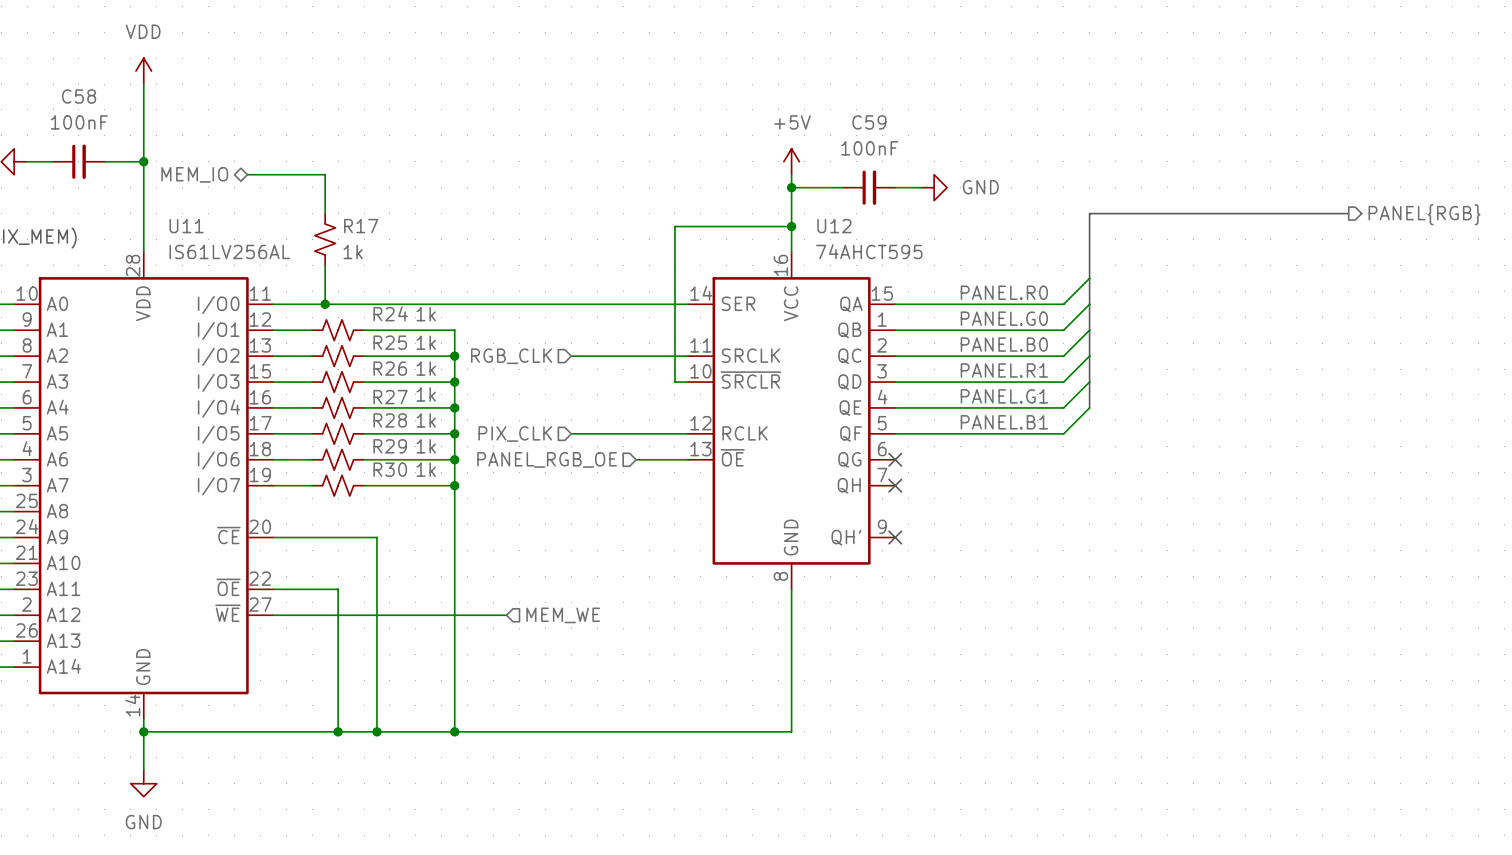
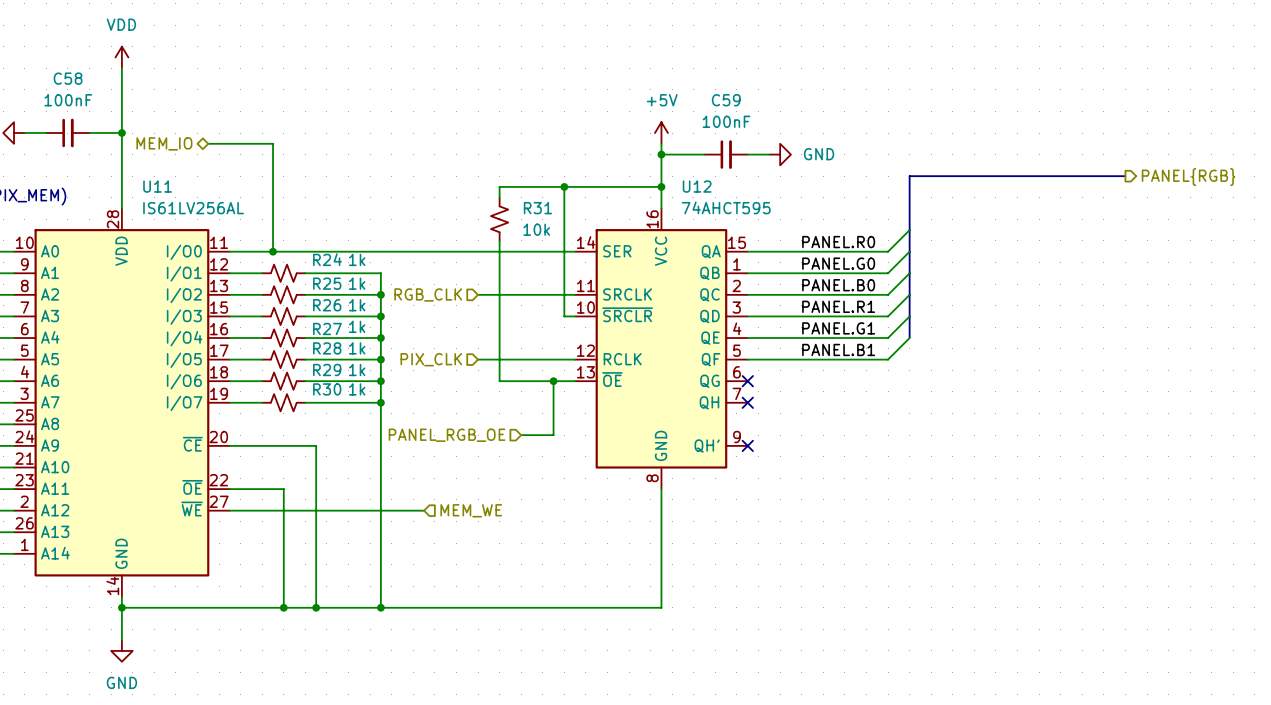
wire: none -> (564, 186) (499, 186) (499, 197)
junction: none -> (564, 186)
R17: 1k (325, 239) -> none
R31: none -> 10k (499, 219)
wire: none -> (499, 240) (499, 381) (531, 381)
hierarchical label position: PANEL_RGB_OE (547, 459) -> PANEL_RGB_OE (447, 435)
wire: none -> (553, 381) (553, 435) (521, 435)
junction: none -> (553, 381)

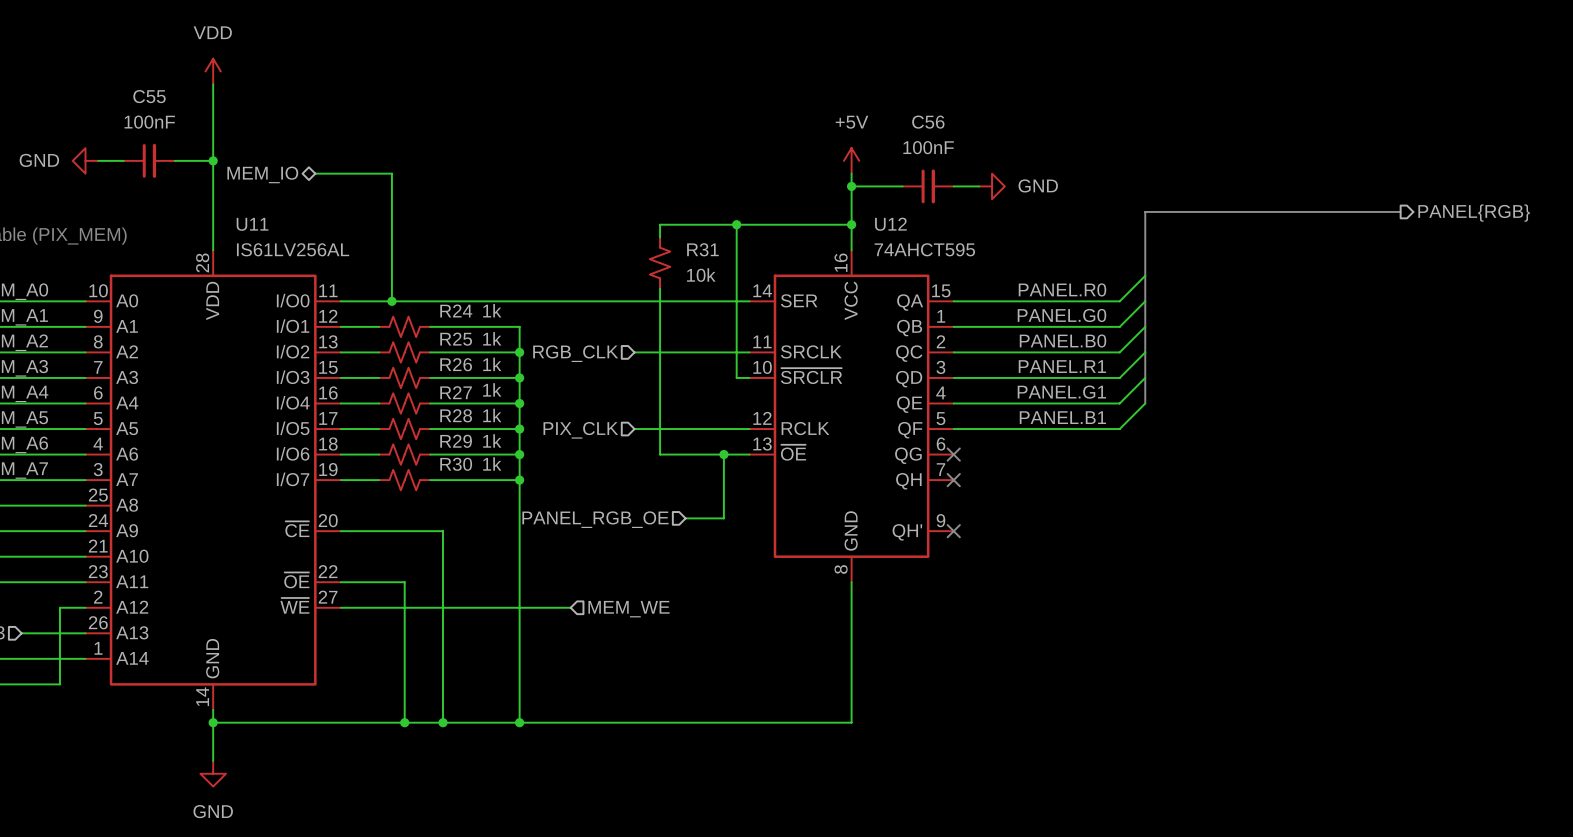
C58 name: C58 (68, 78) -> C55 (149, 96)
C59 name: C59 (726, 100) -> C56 (928, 122)

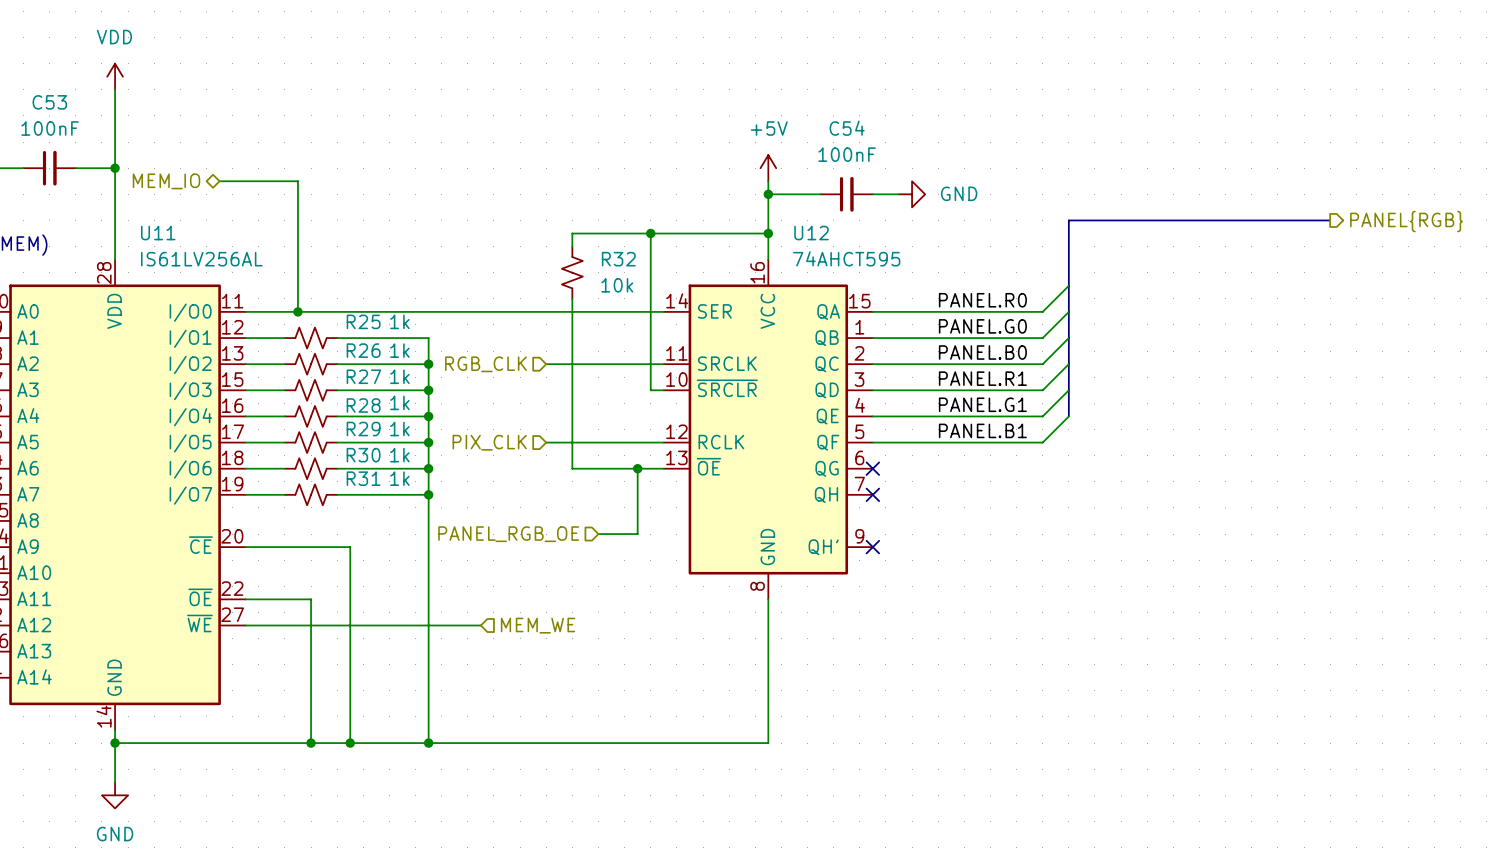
C55 name: C55 (149, 96) -> C53 (49, 102)
C56 name: C56 (928, 122) -> C54 (847, 128)
R31 name: R31 (702, 249) -> R32 (618, 259)
R24 name: R24 (456, 310) -> R25 (363, 321)
R25 name: R25 (456, 339) -> R26 (363, 350)
R26 name: R26 (456, 364) -> R27 (363, 376)
R27 name: R27 (456, 392) -> R28 (363, 405)
R28 name: R28 (456, 415) -> R29 (363, 429)
R29 name: R29 (456, 441) -> R30 (363, 455)
R30 name: R30 (456, 464) -> R31 (363, 478)

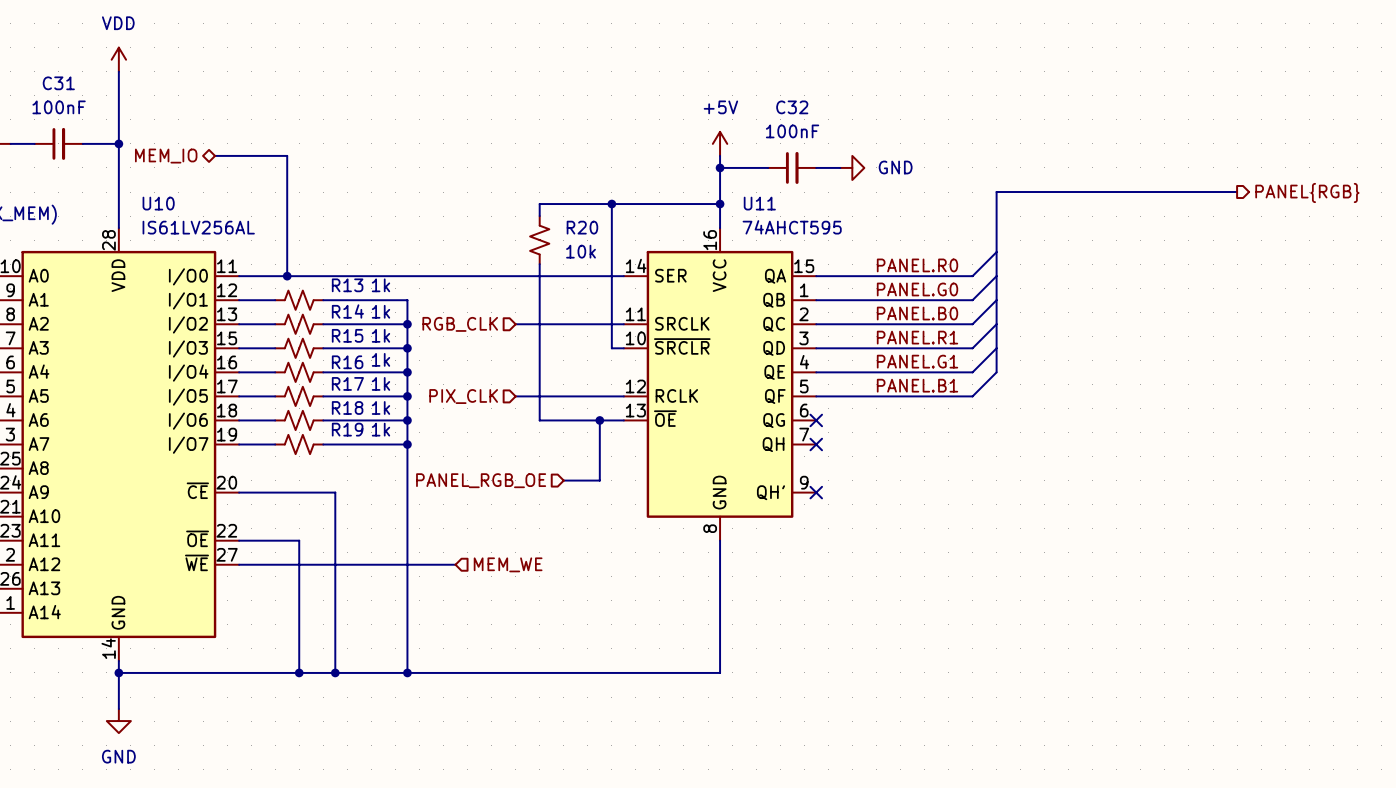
C53 name: C53 (49, 102) -> C31 (58, 83)
C54 name: C54 (847, 128) -> C32 (792, 107)
U11 name: U11 (158, 233) -> U10 (158, 203)
U12 name: U12 (811, 233) -> U11 (759, 203)
R32 name: R32 (618, 259) -> R20 (582, 227)
R25 name: R25 (363, 321) -> R13 (347, 285)
R26 name: R26 (363, 350) -> R14 (347, 311)
R27 name: R27 (363, 376) -> R15 (347, 335)
R28 name: R28 (363, 405) -> R16 (347, 362)
R29 name: R29 (363, 429) -> R17 (347, 383)
R30 name: R30 (363, 455) -> R18 (347, 407)
R31 name: R31 (363, 478) -> R19 (347, 429)

